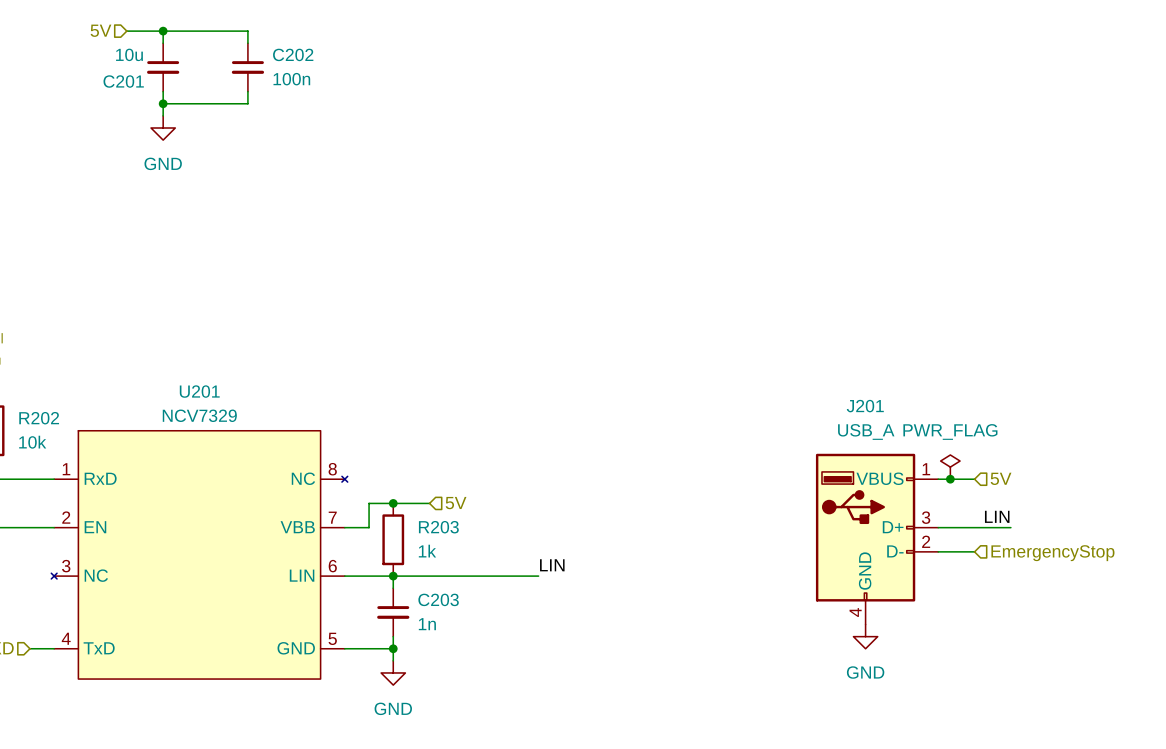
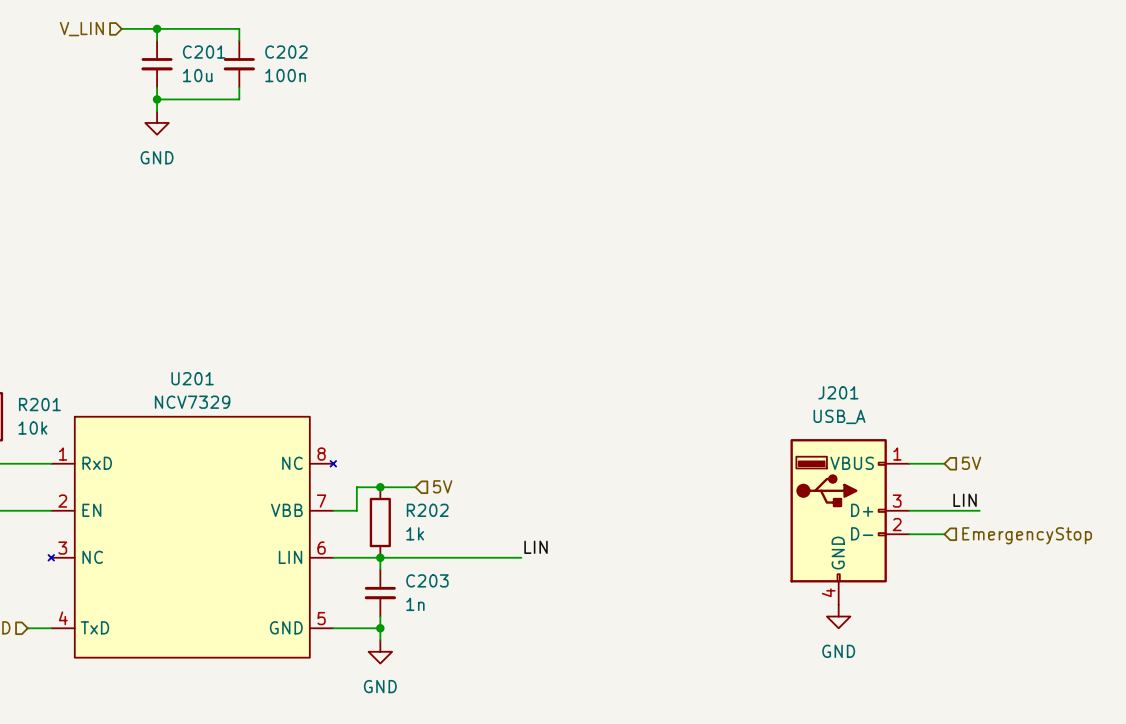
hierarchical label: 5V (100, 30) -> V_LIN (81, 29)
C201 value position: 10u (129, 54) -> 10u (197, 75)
C201 name position: C201 (123, 81) -> C201 (204, 52)
R202 name: R202 (39, 418) -> R201 (39, 404)
power symbol: PWR_FLAG (950, 467) -> none
junction: (950, 479) -> none
R203 name: R203 (438, 527) -> R202 (427, 510)

